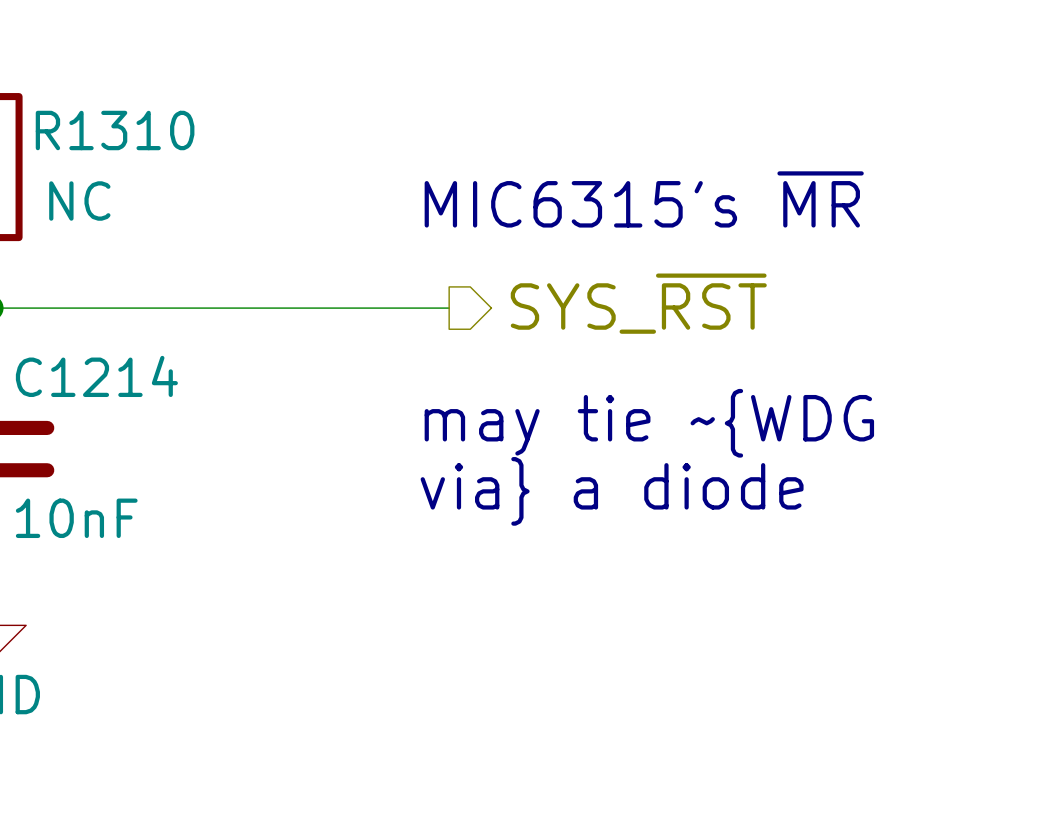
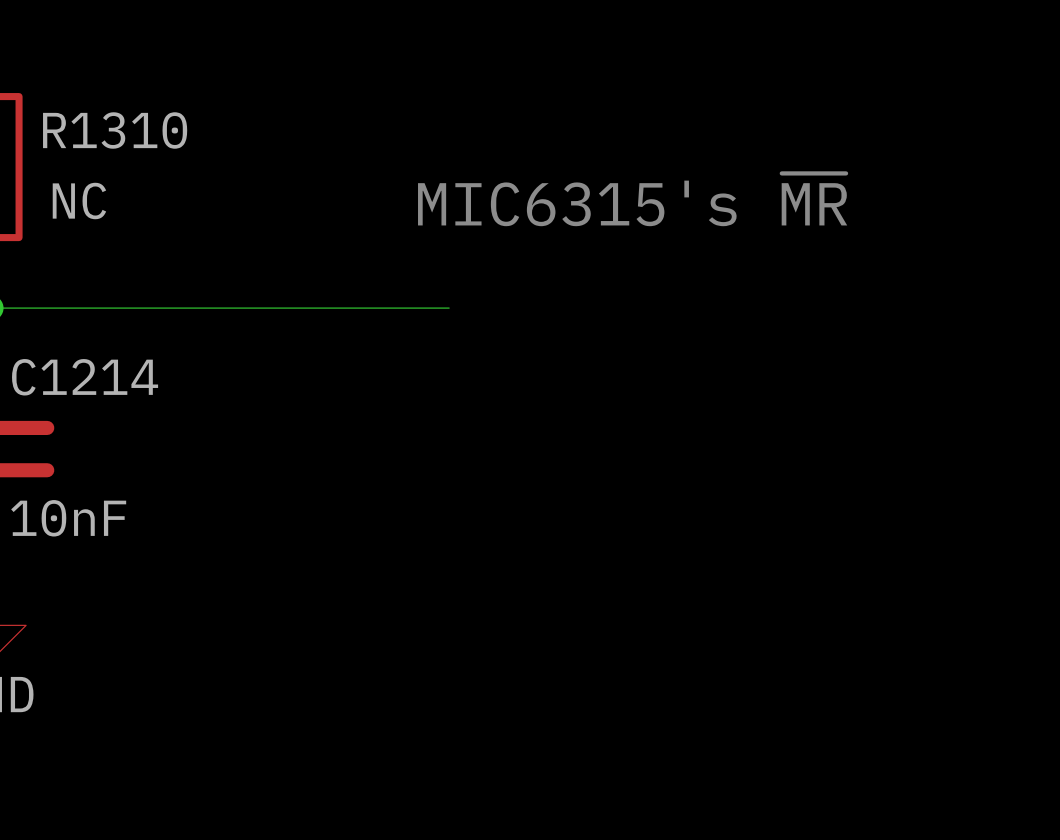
hierarchical label: SYS_~{RST} (638, 303) -> none
text: may tie ~{WDG (649, 423) -> none
text: via} a diode (612, 491) -> none

